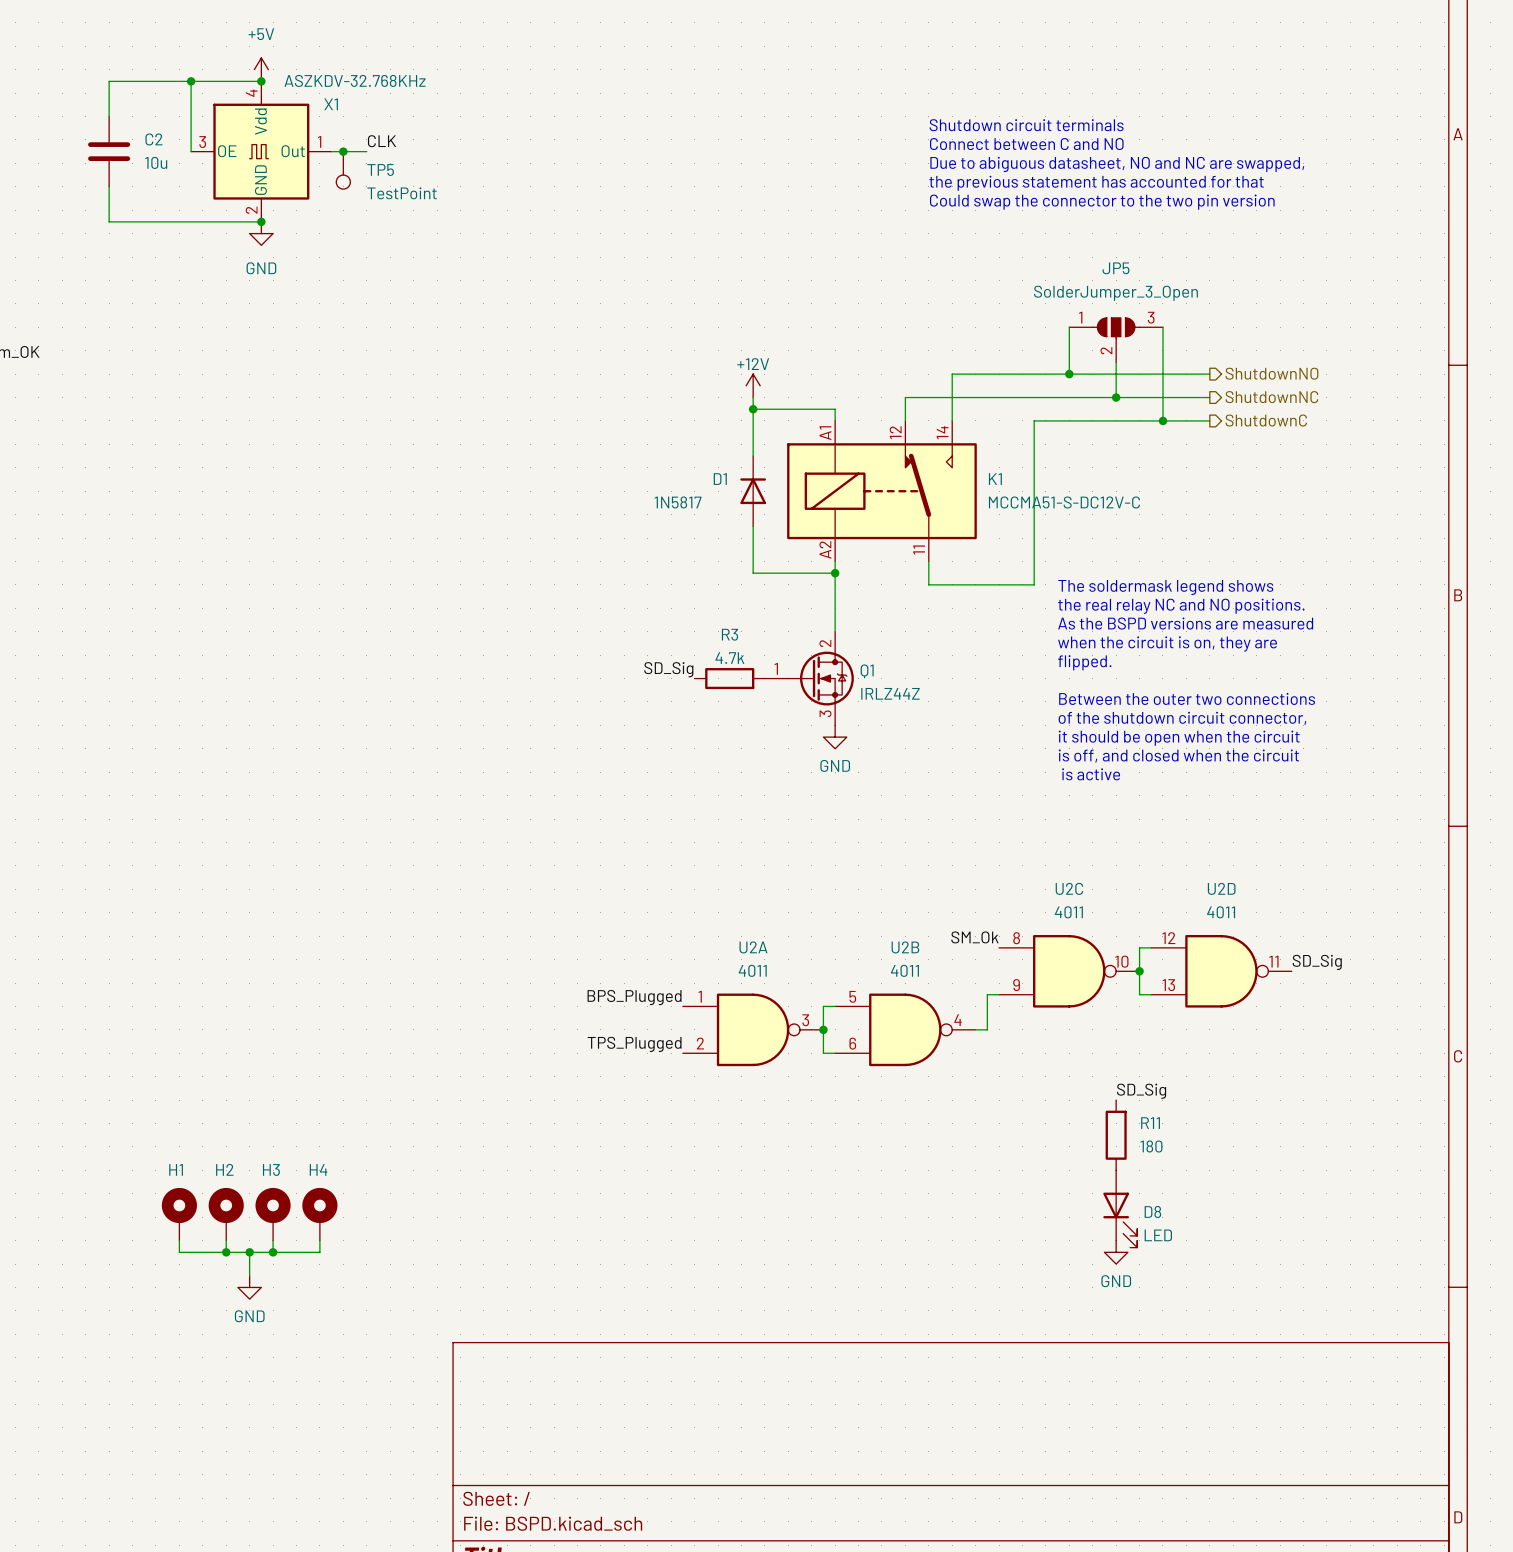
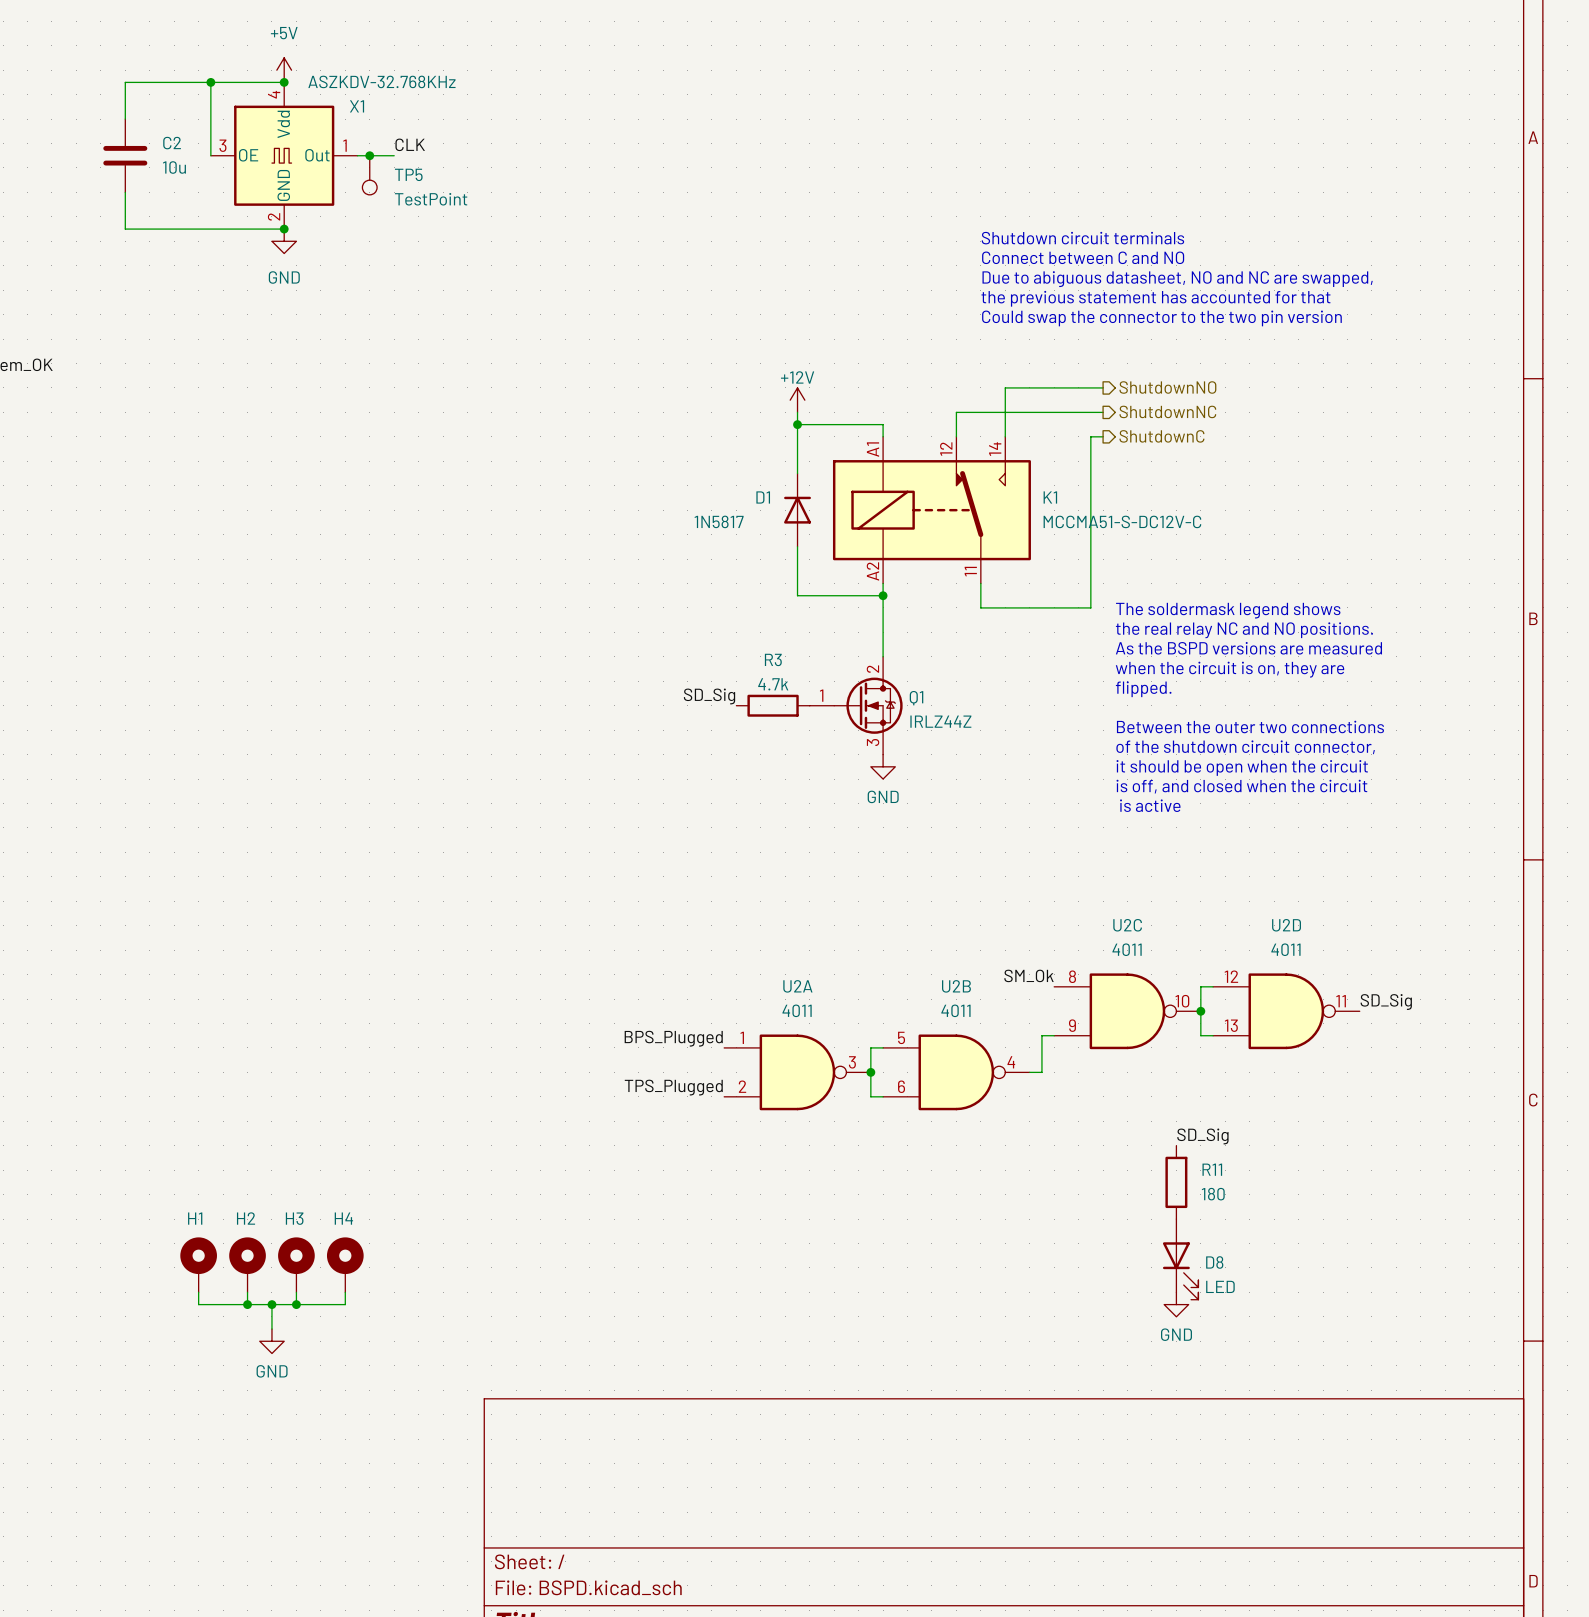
text position: Shutdown circuit terminals (1026, 125) -> Shutdown circuit terminals (1082, 238)
text position: Connect between C and NO (1026, 144) -> Connect between C and NO (1083, 257)
text position: Due to abiguous datasheet, NO and NC are swapped, (1117, 164) -> Due to abiguous datasheet, NO and NC are swapped, (1177, 279)
text position: the previous statement has accounted for that (1096, 183) -> the previous statement has accounted for that (1155, 298)
text position: Could swap the connector to the two pin version (1102, 202) -> Could swap the connector to the two pin version (1161, 318)
wire: (1069, 327) (1069, 374) -> none
wire: (1162, 327) (1162, 420) -> none
JP5: SolderJumper_3_Open (1116, 340) -> none
wire: (1116, 362) (1116, 397) -> none
hierarchical label position: ShutdownNO (1271, 373) -> ShutdownNO (1167, 387)
wire: (1045, 374) (1209, 374) -> none
junction: (1069, 374) -> none
wire: (1045, 397) (1209, 397) -> none
junction: (1116, 397) -> none
hierarchical label position: ShutdownNC (1271, 397) -> ShutdownNC (1167, 411)
wire: (1045, 420) (1209, 420) -> none
junction: (1162, 420) -> none
hierarchical label position: ShutdownC (1266, 420) -> ShutdownC (1161, 436)

